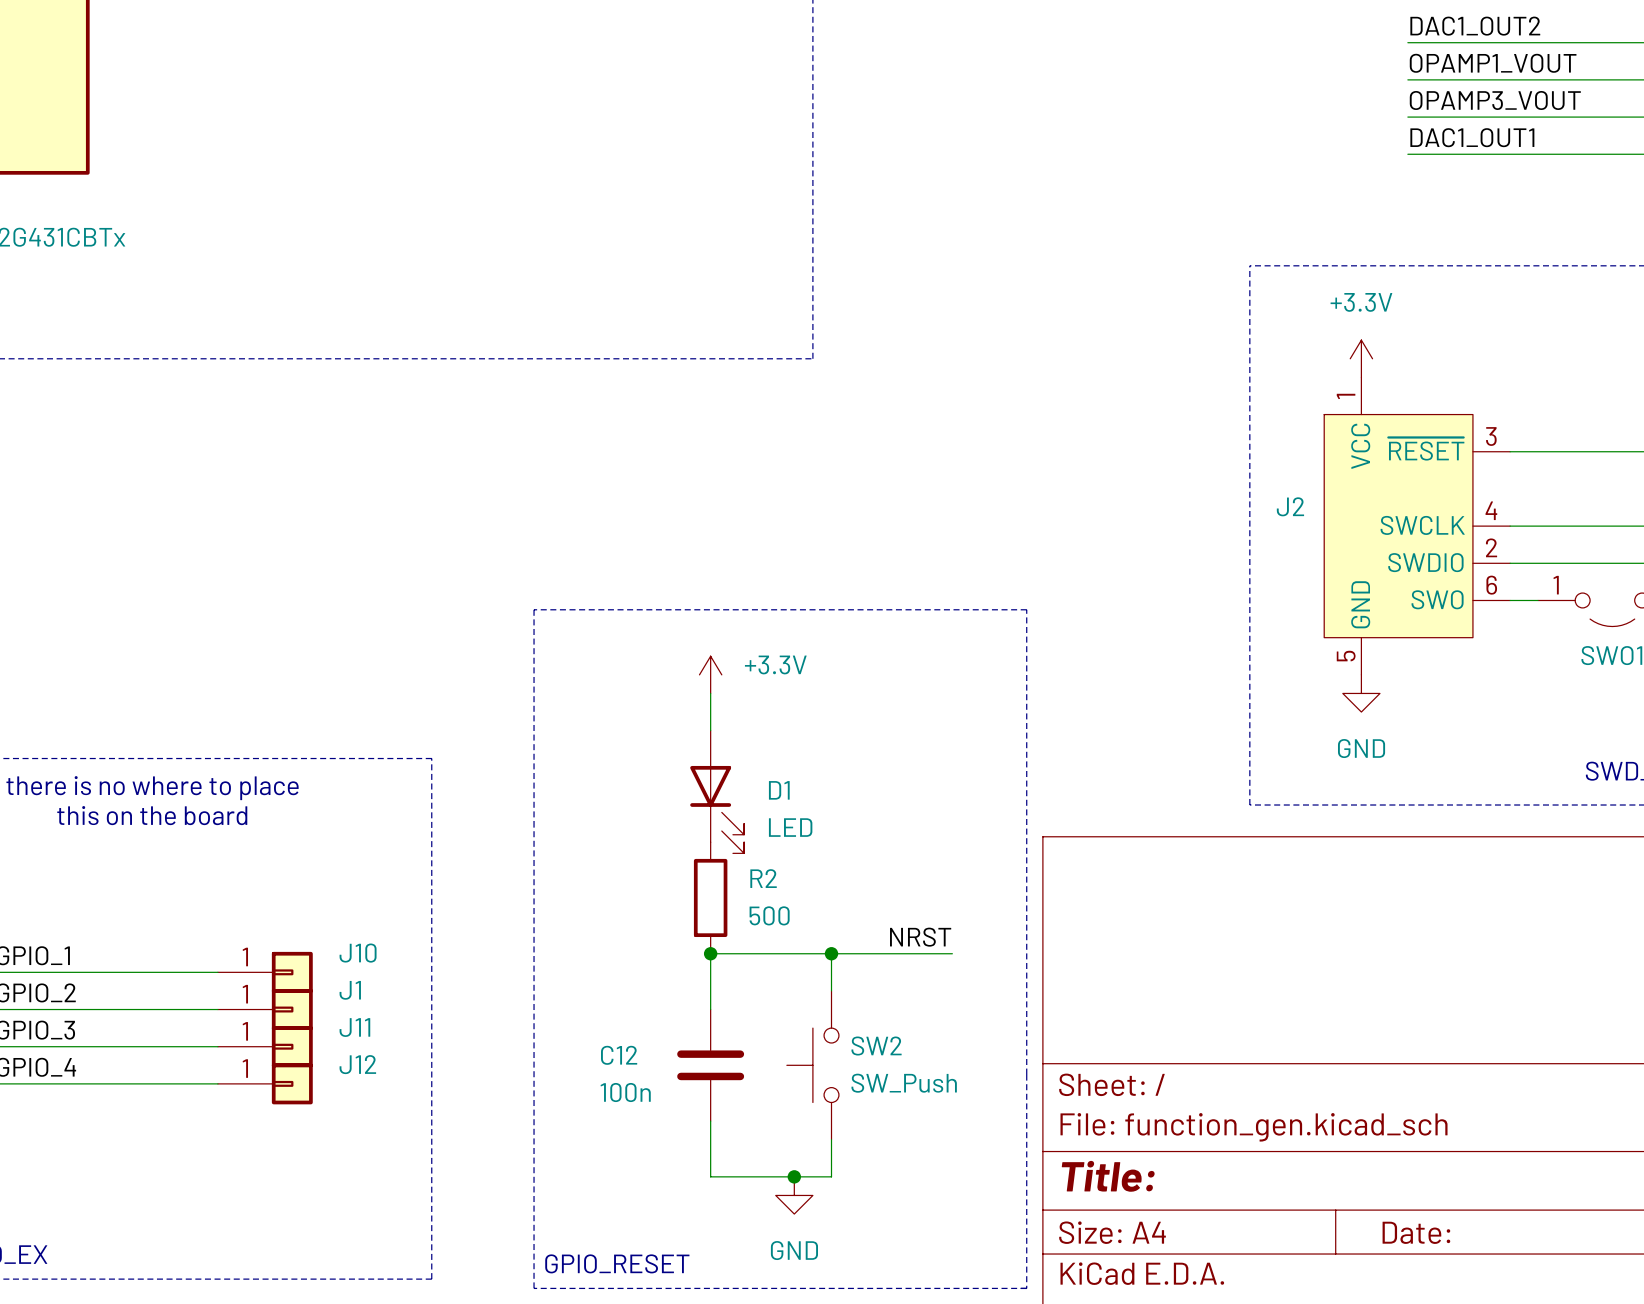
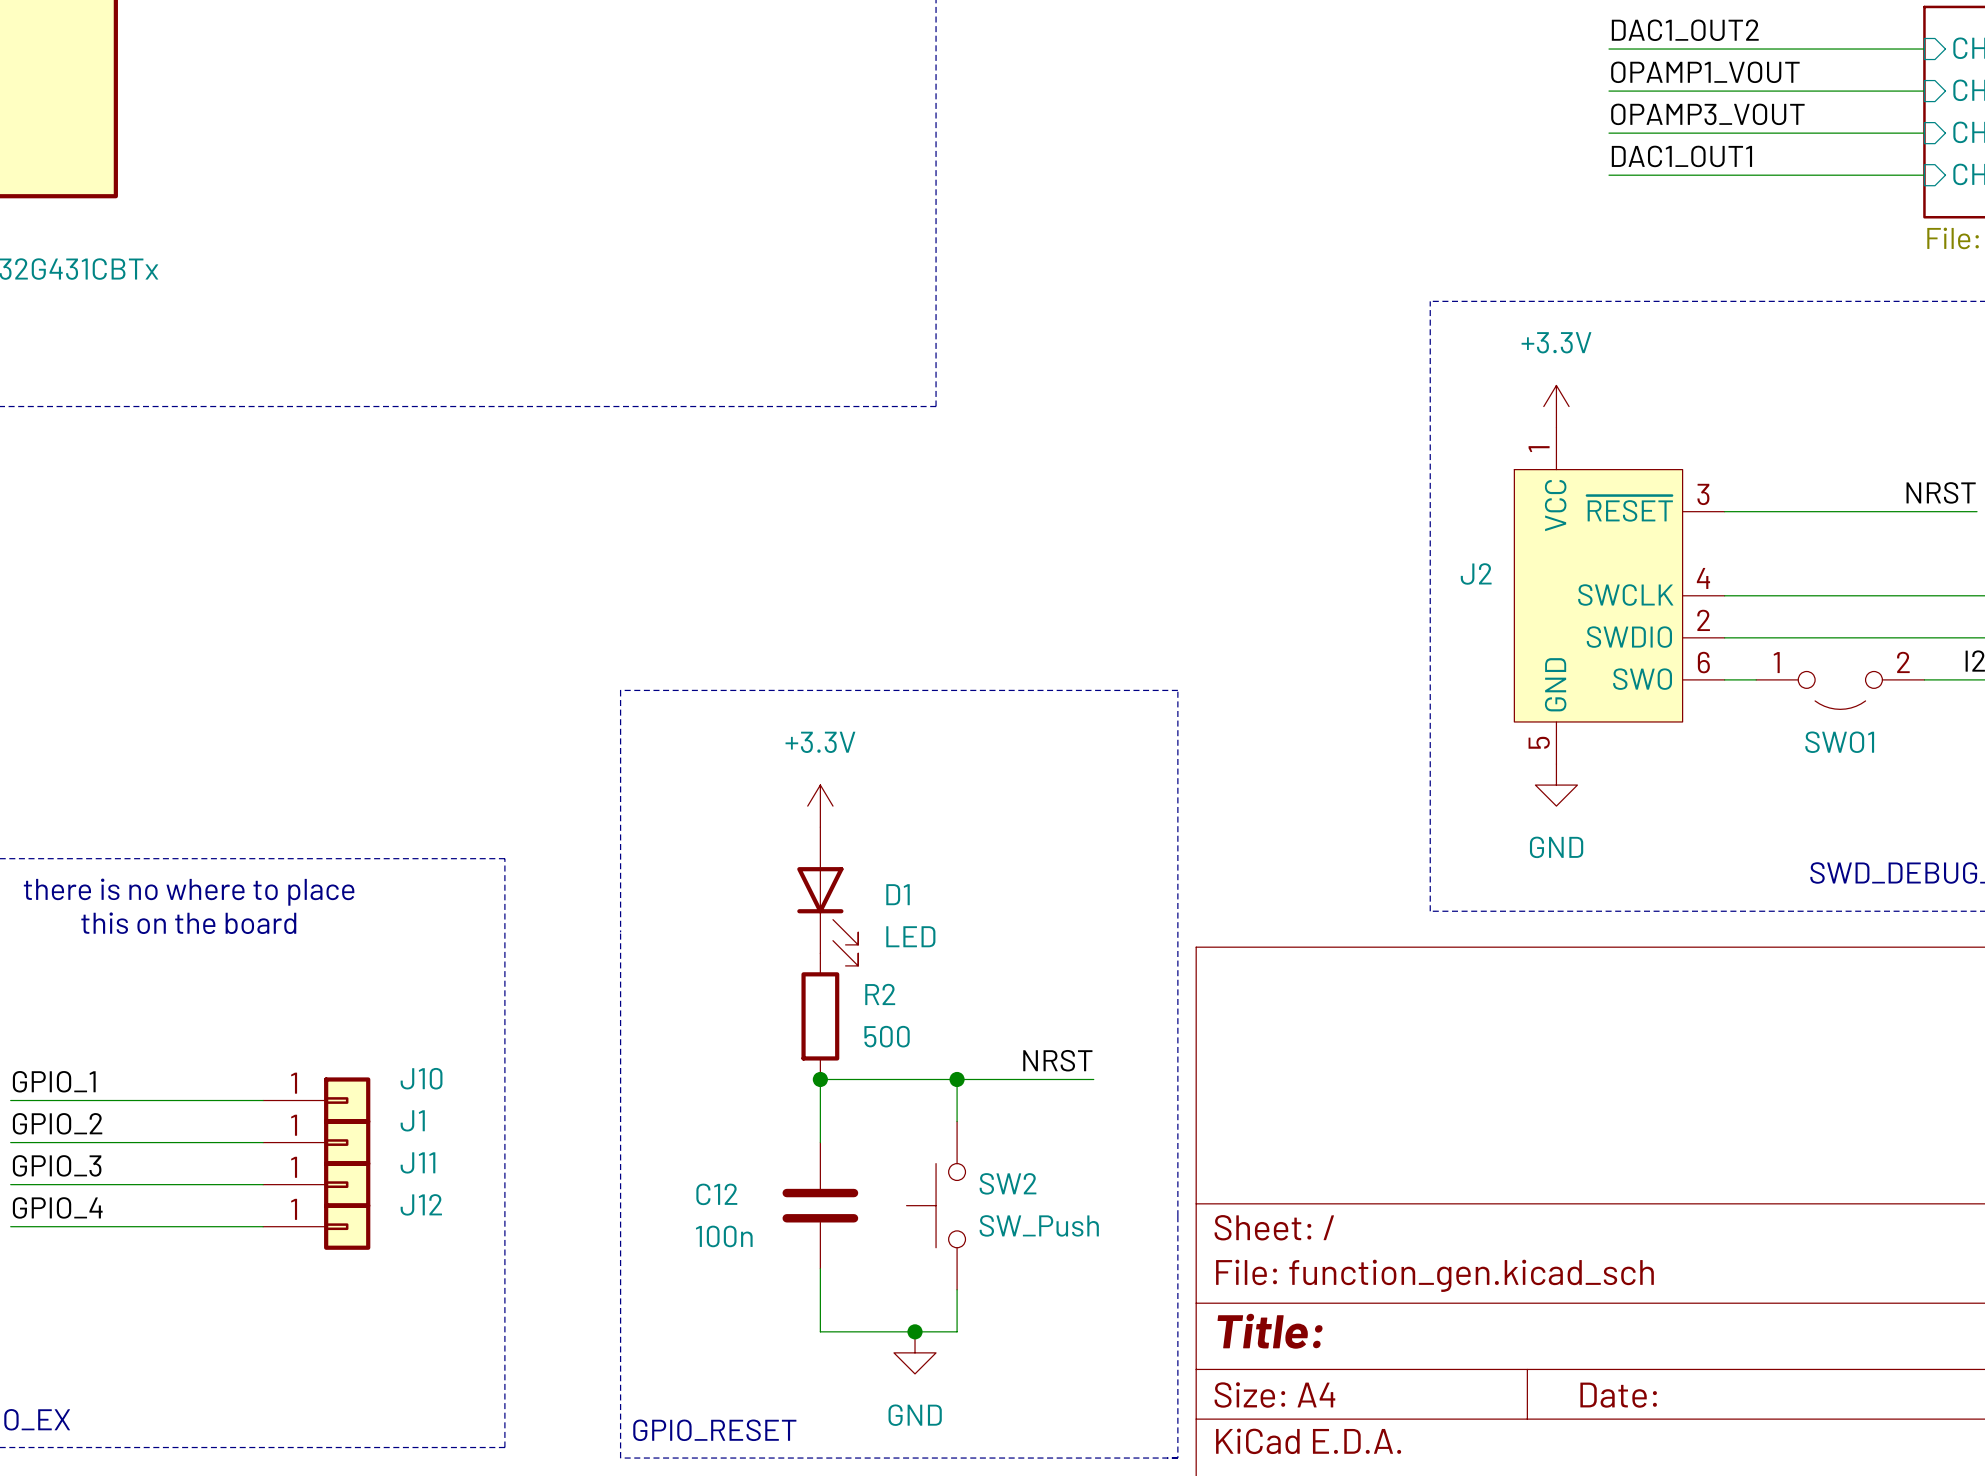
power symbol text position: +3.3V (775, 664) -> +3.3V (820, 742)
power symbol position: +3.3V (710, 674) -> +3.3V (820, 806)

